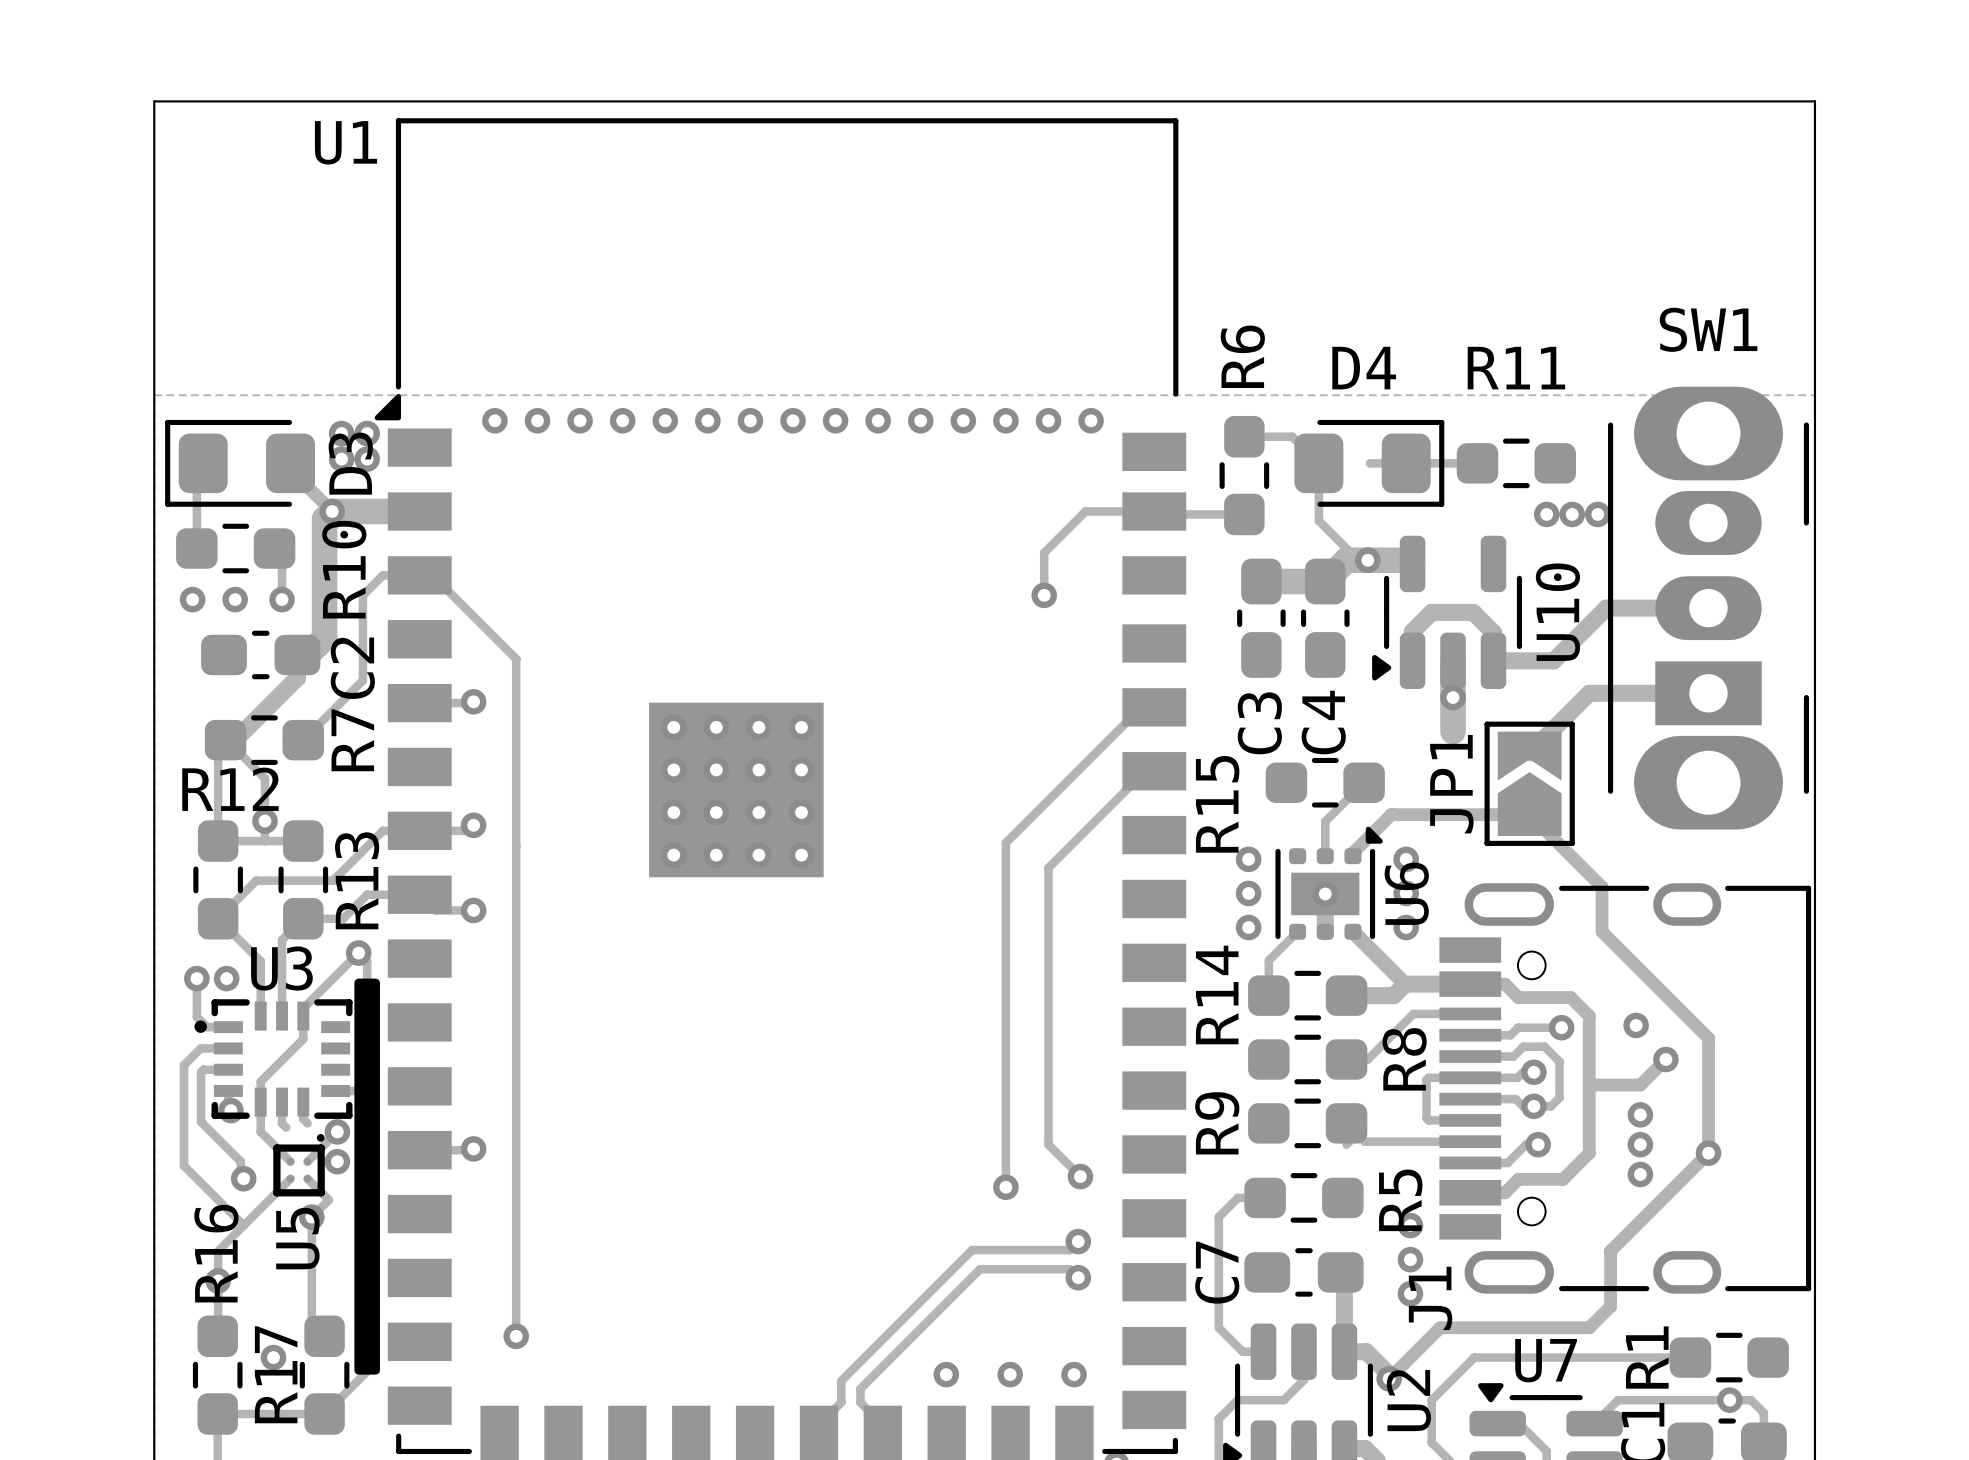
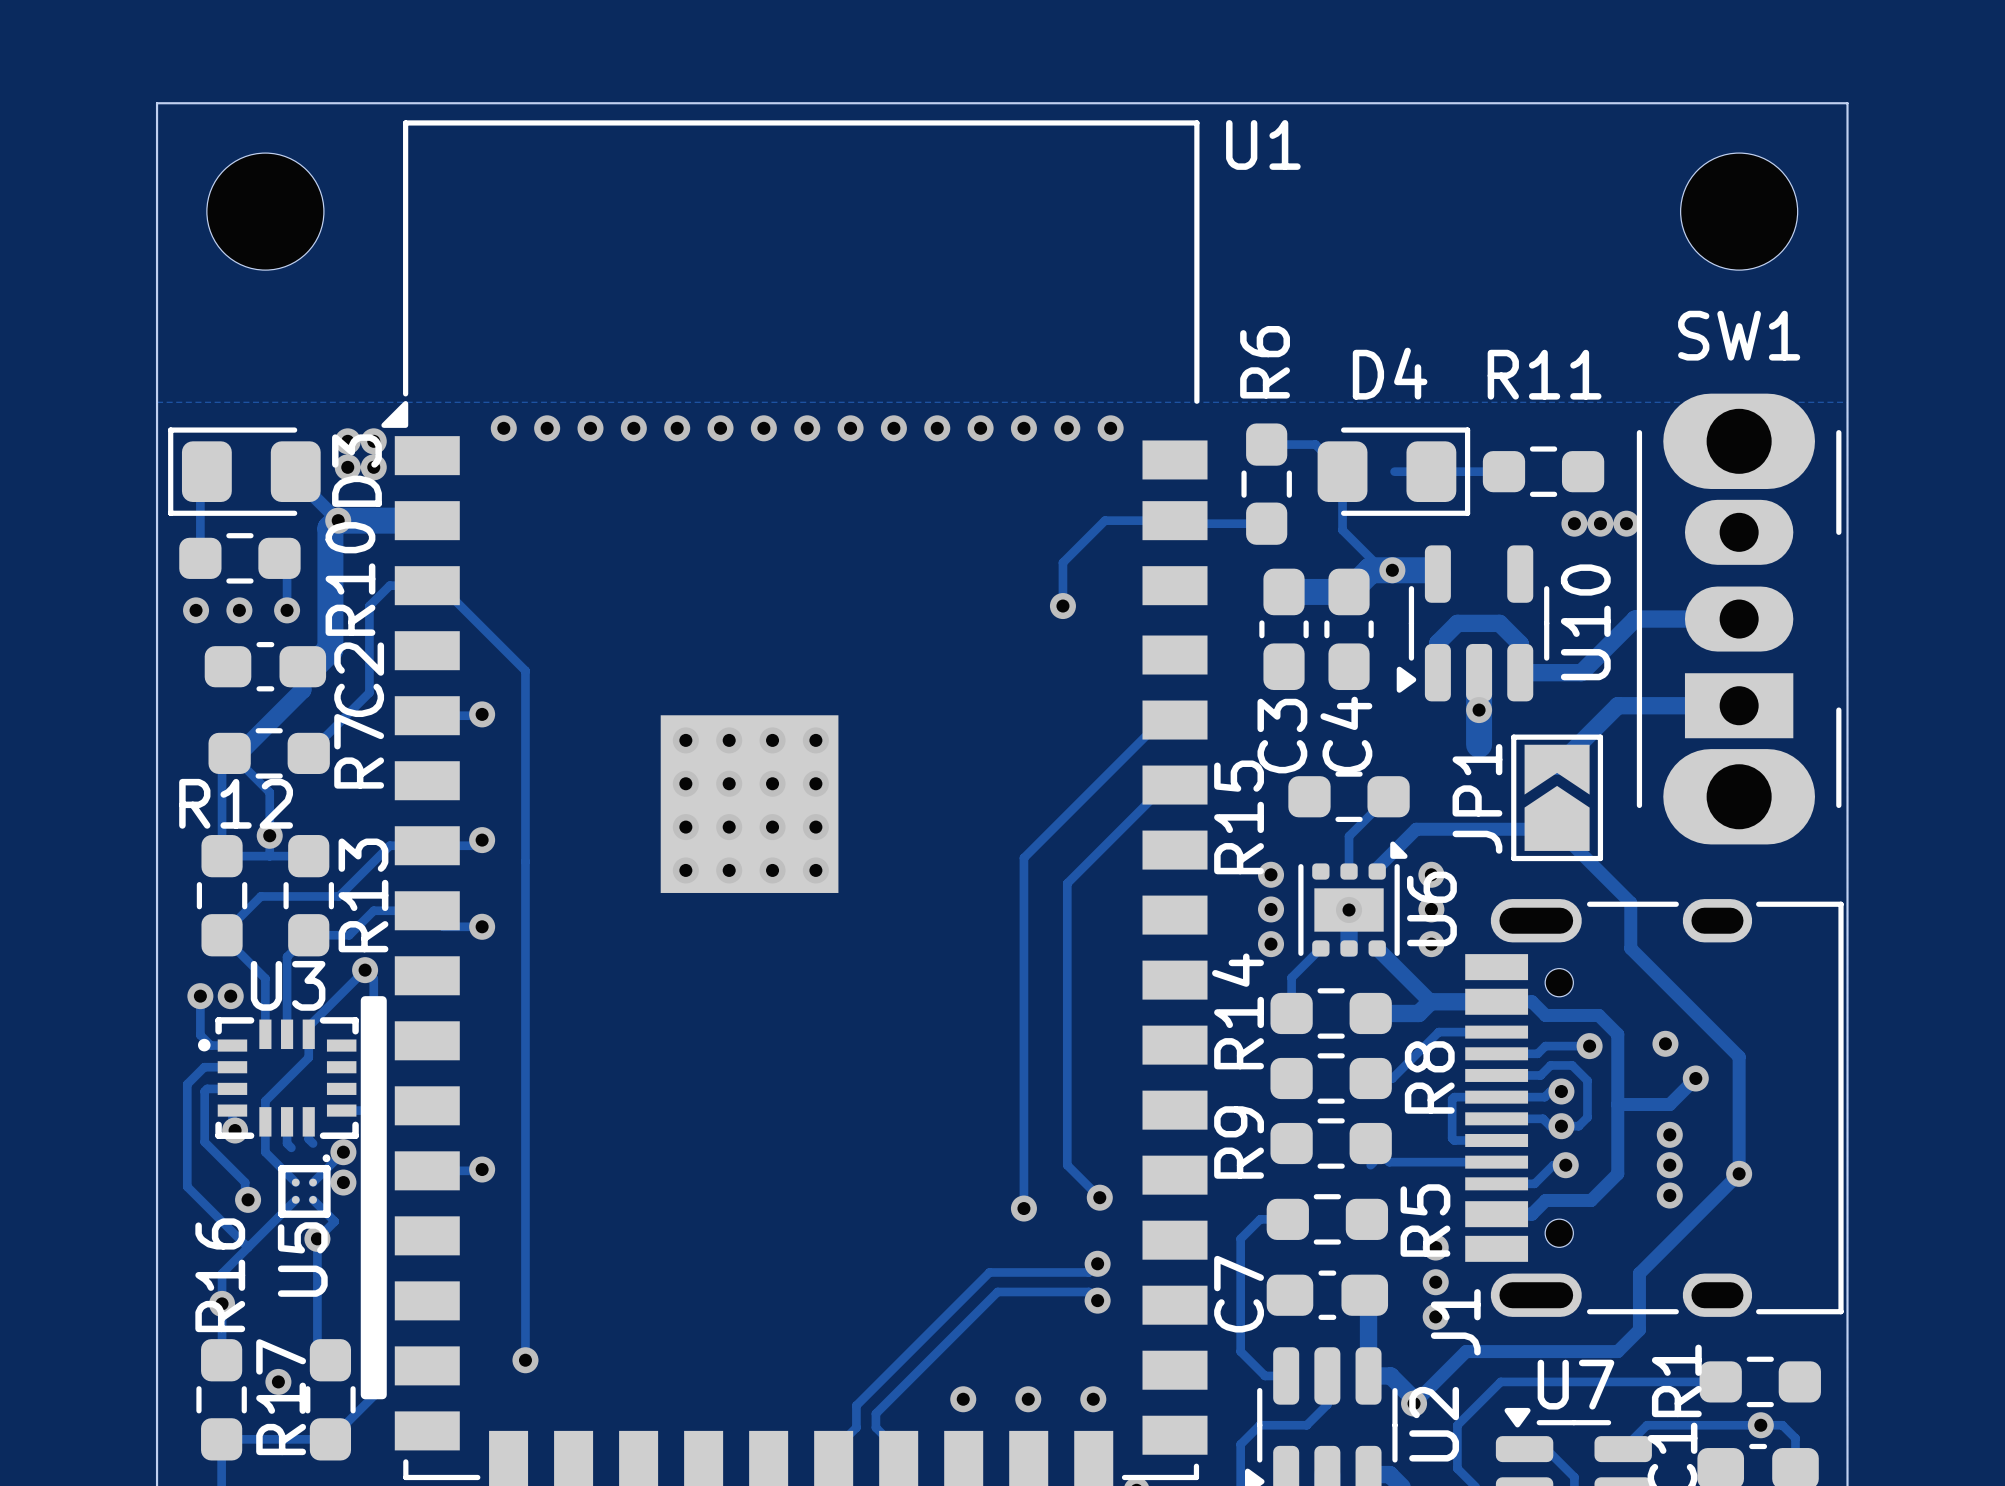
U1 name position: U1 (346, 142) -> U1 (1263, 144)
part: none -> (265, 211)
part: none -> (1739, 211)

